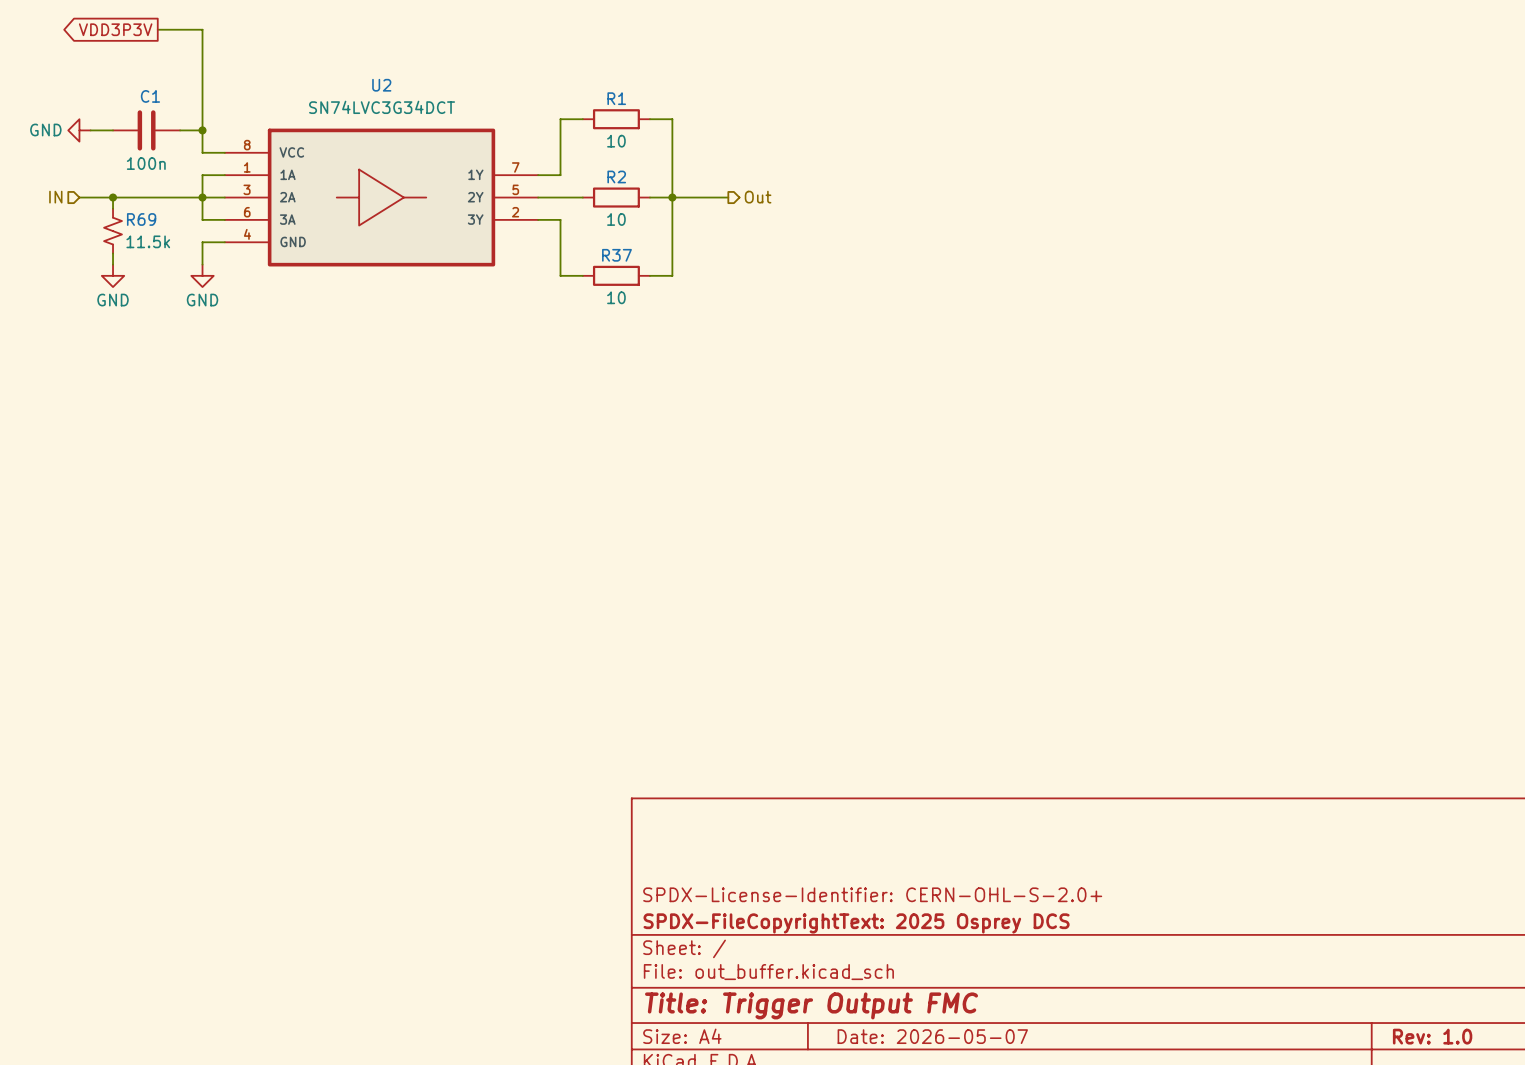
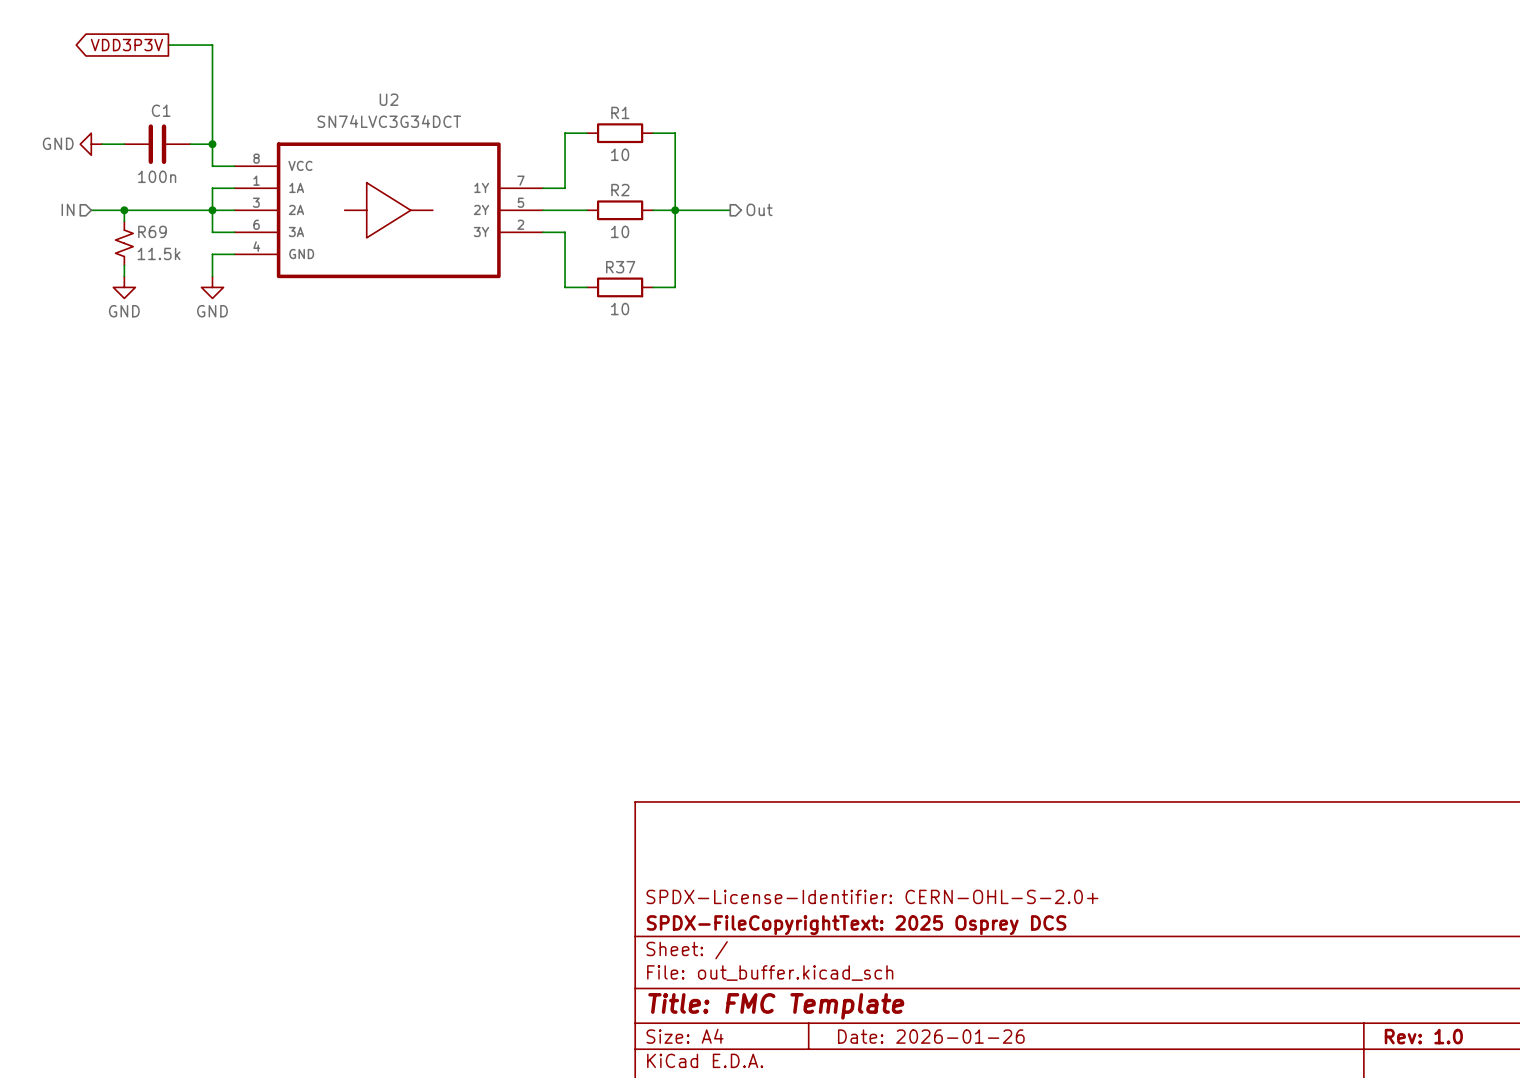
title block: Title: Trigger Output FMC (811, 1005) -> Title: FMC Template (776, 1006)
title block: Date: 2026-05-07 (932, 1036) -> Date: 2026-01-26 (931, 1036)

